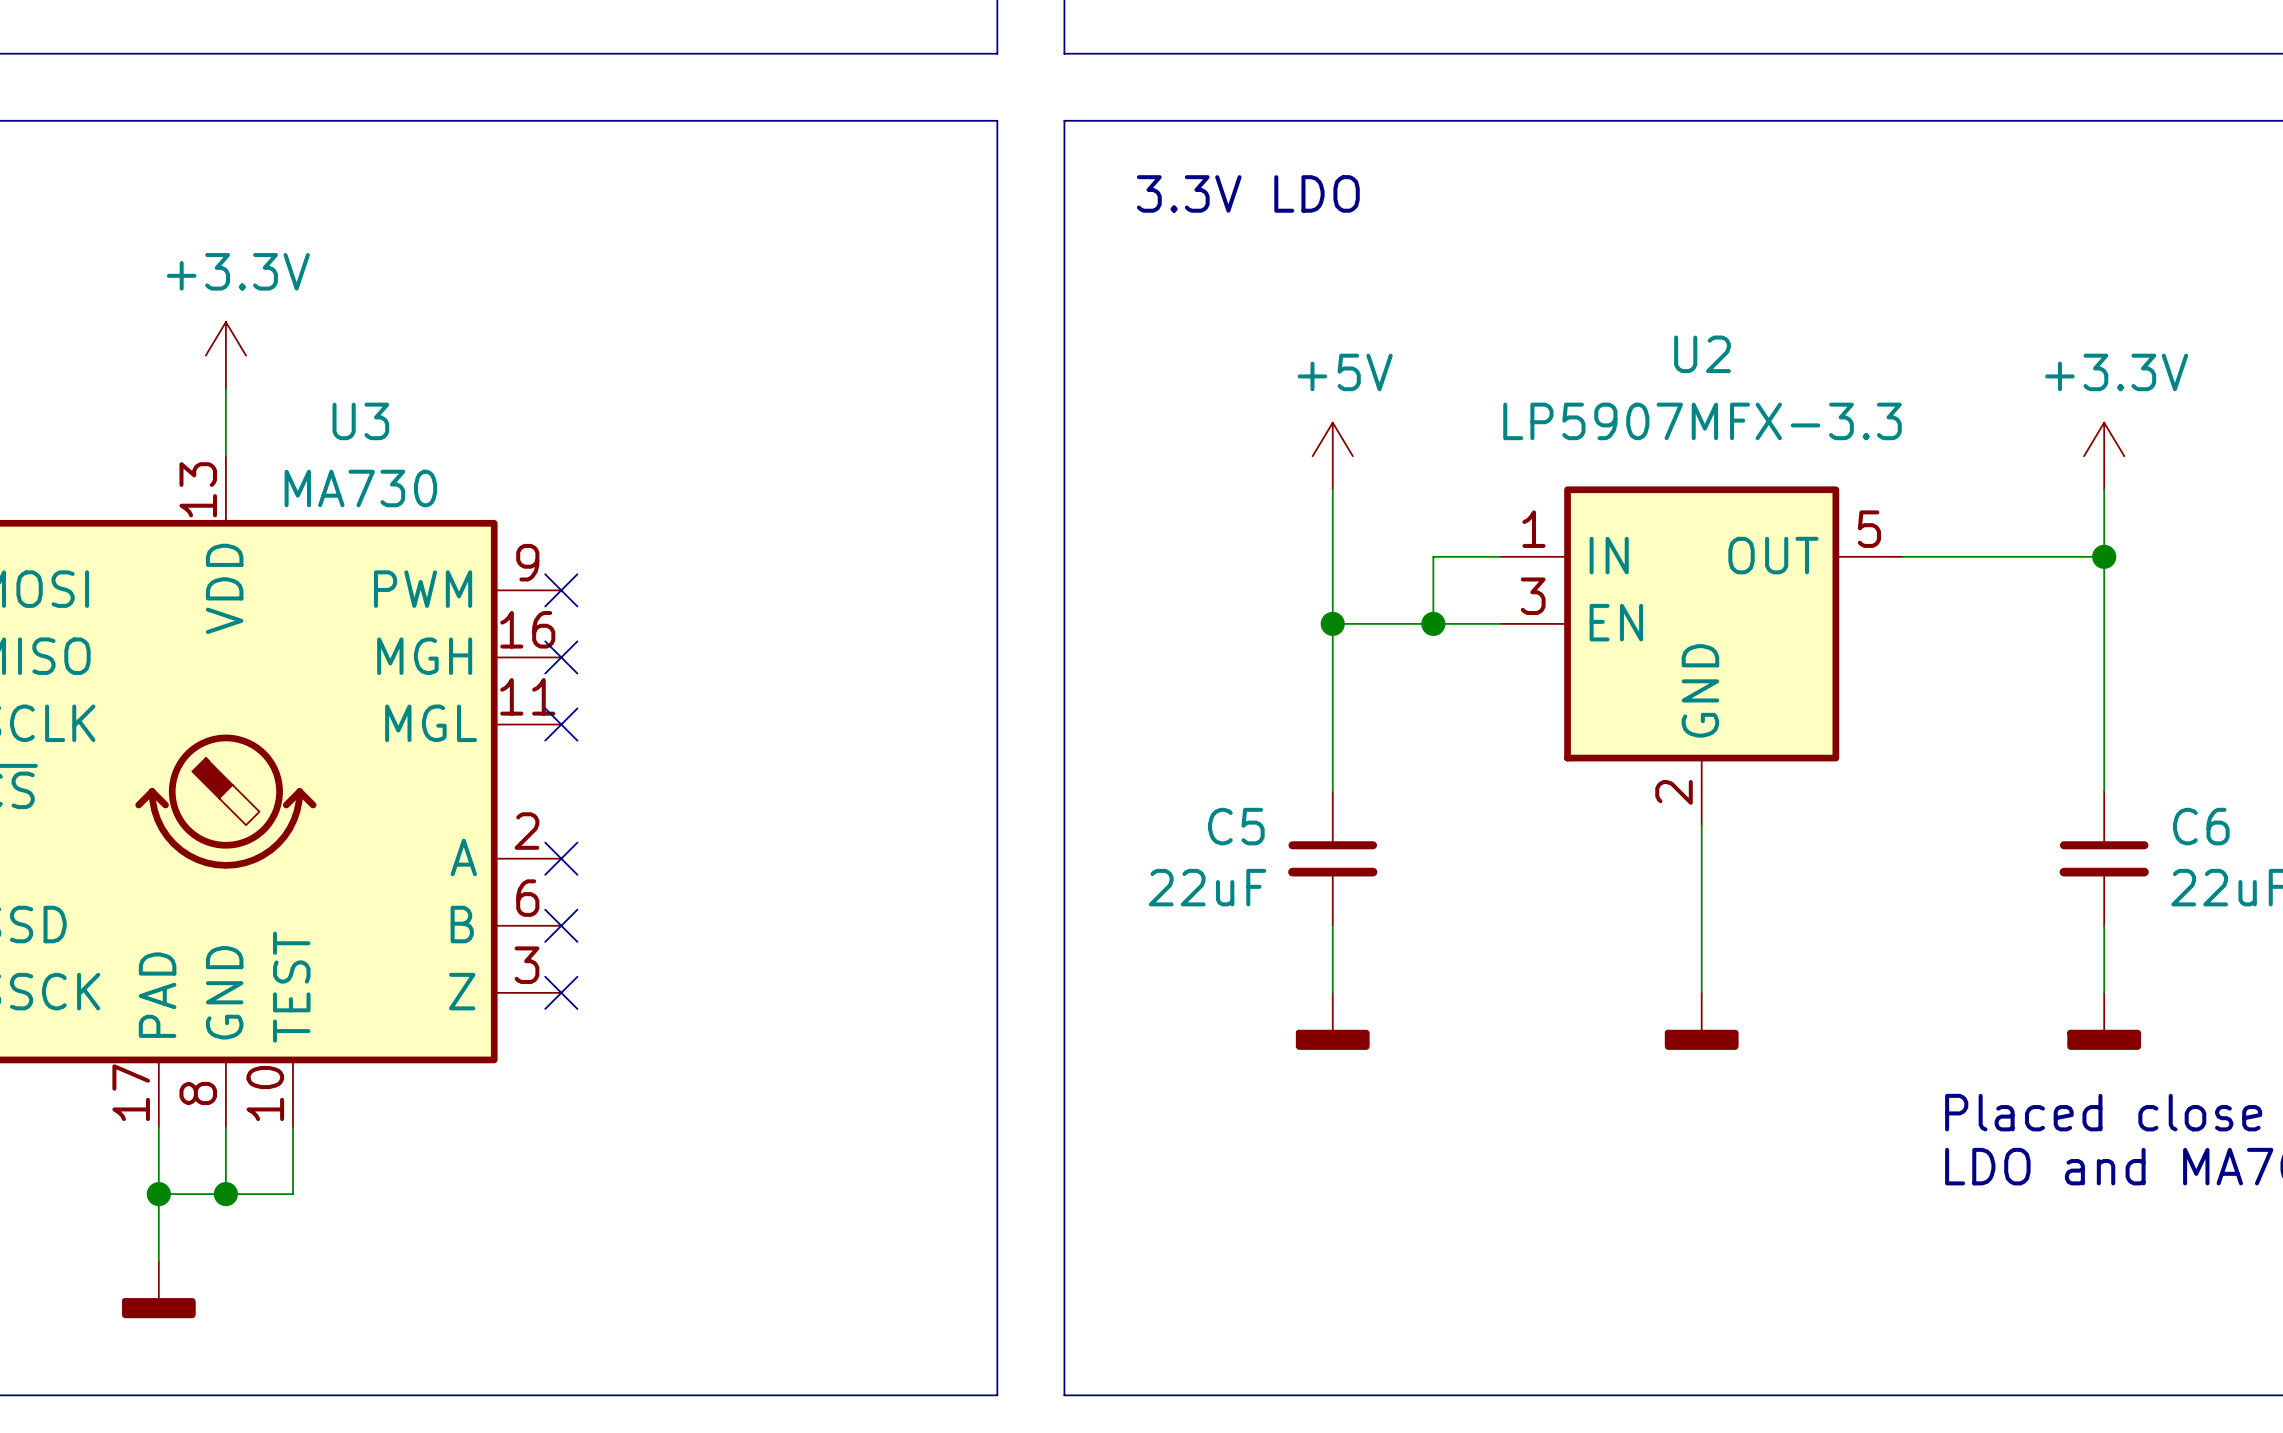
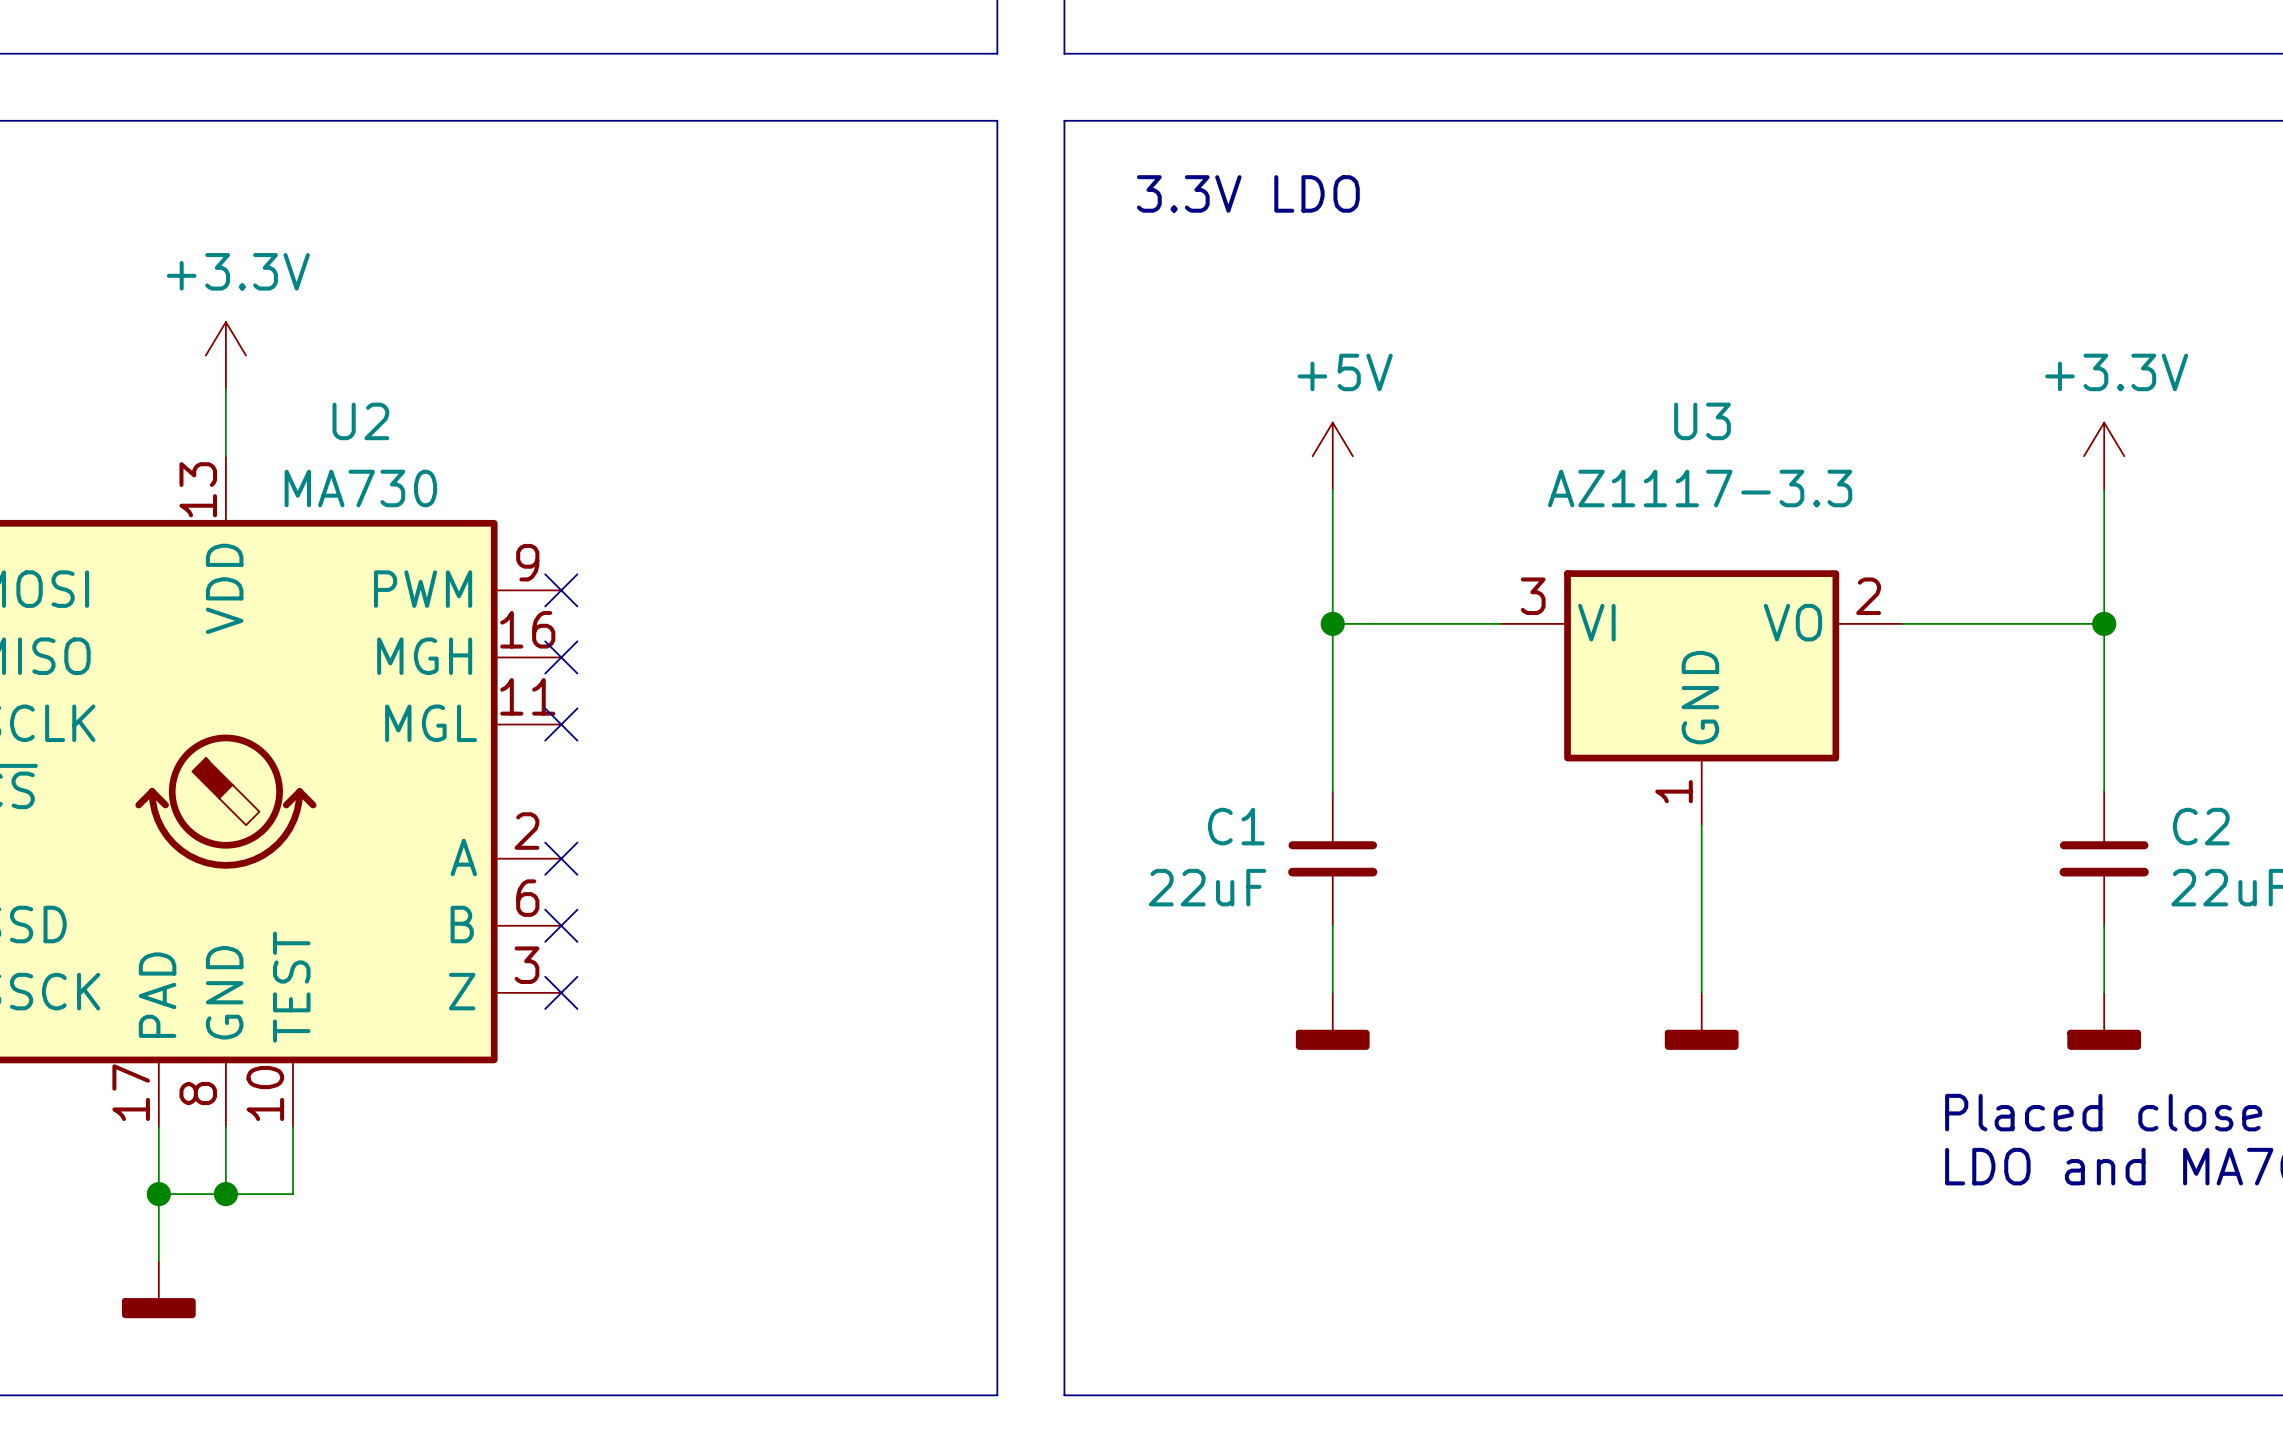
U3 name: U3 (360, 421) -> U2 (360, 421)
wire: (1500, 556) (1433, 556) (1433, 623) -> none
wire: (1902, 556) (2104, 556) -> (1902, 623) (2104, 623)
junction position: (2104, 556) -> (2104, 623)
junction: (1433, 623) -> none
U2: LP5907MFX-3.3 (1701, 655) -> none
U3: none -> AZ1117-3.3 (1701, 697)
C5 name: C5 (1236, 826) -> C1 (1236, 826)
C6 name: C6 (2201, 826) -> C2 (2201, 826)

